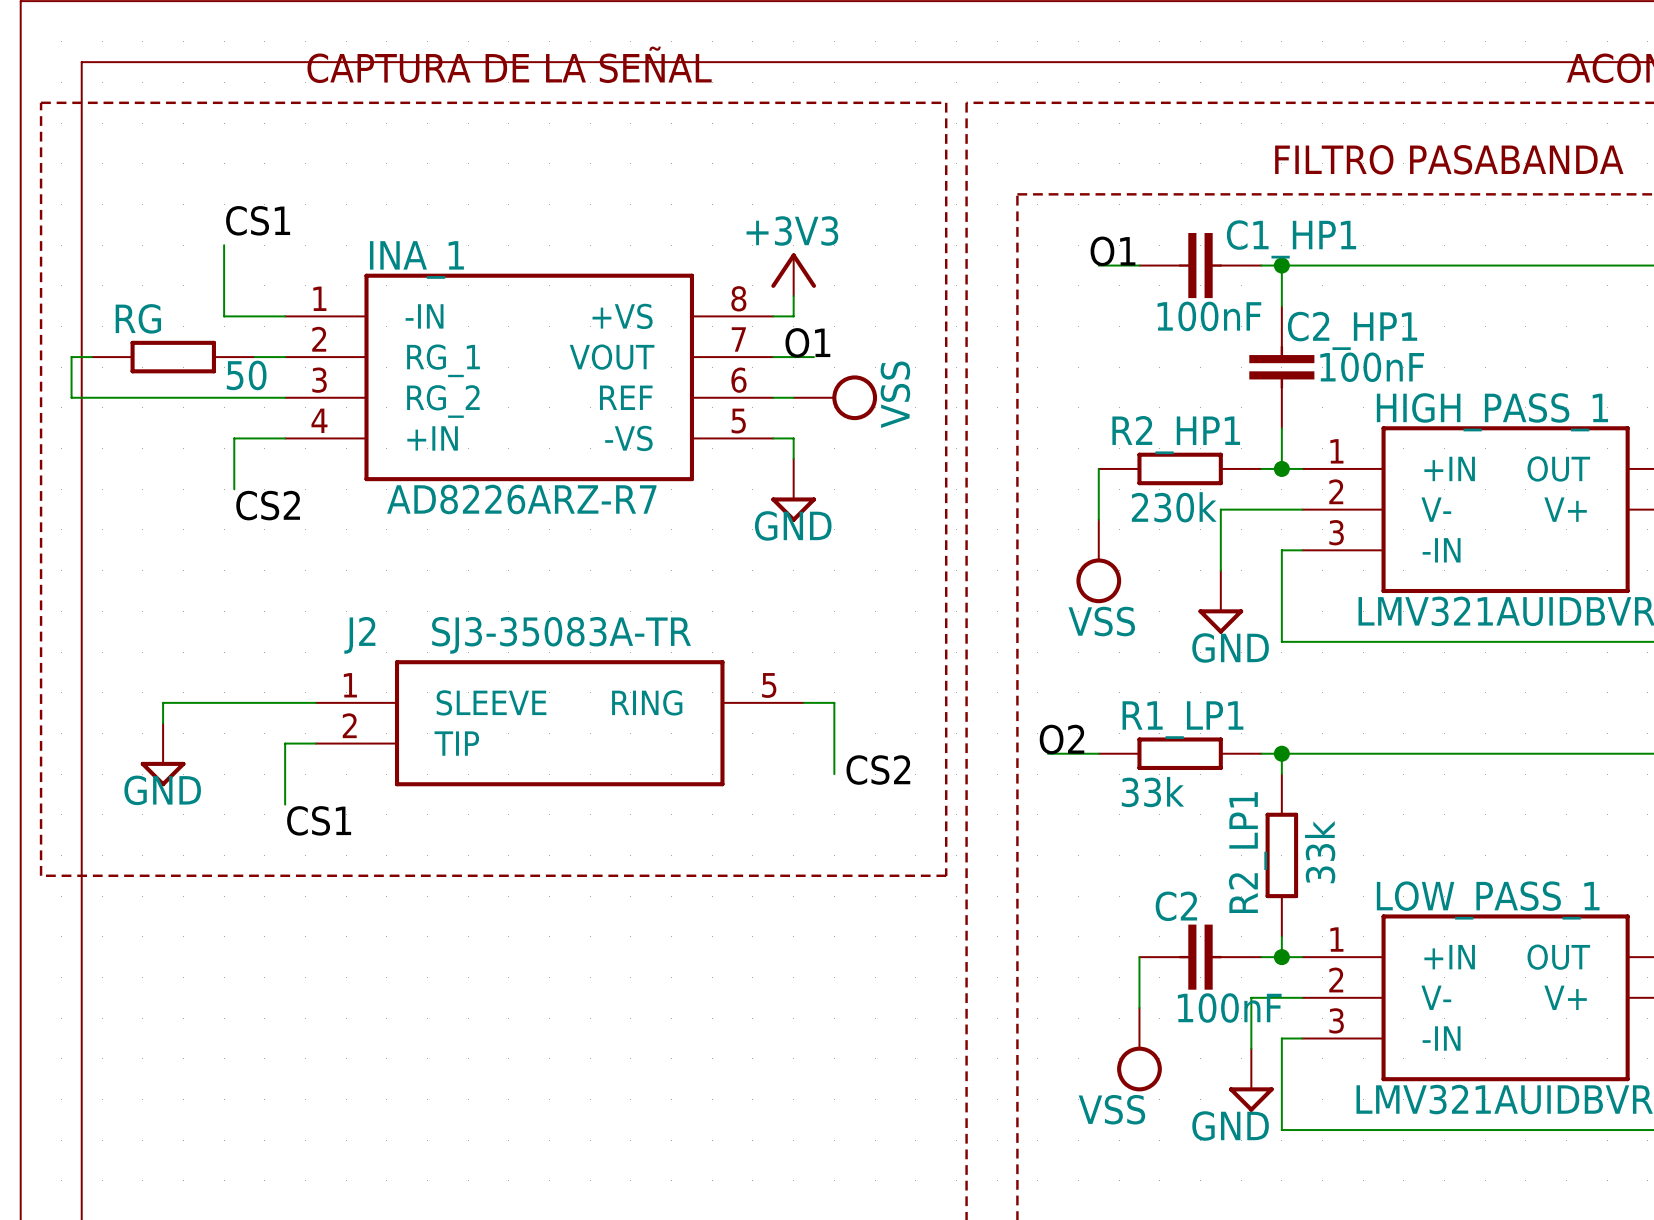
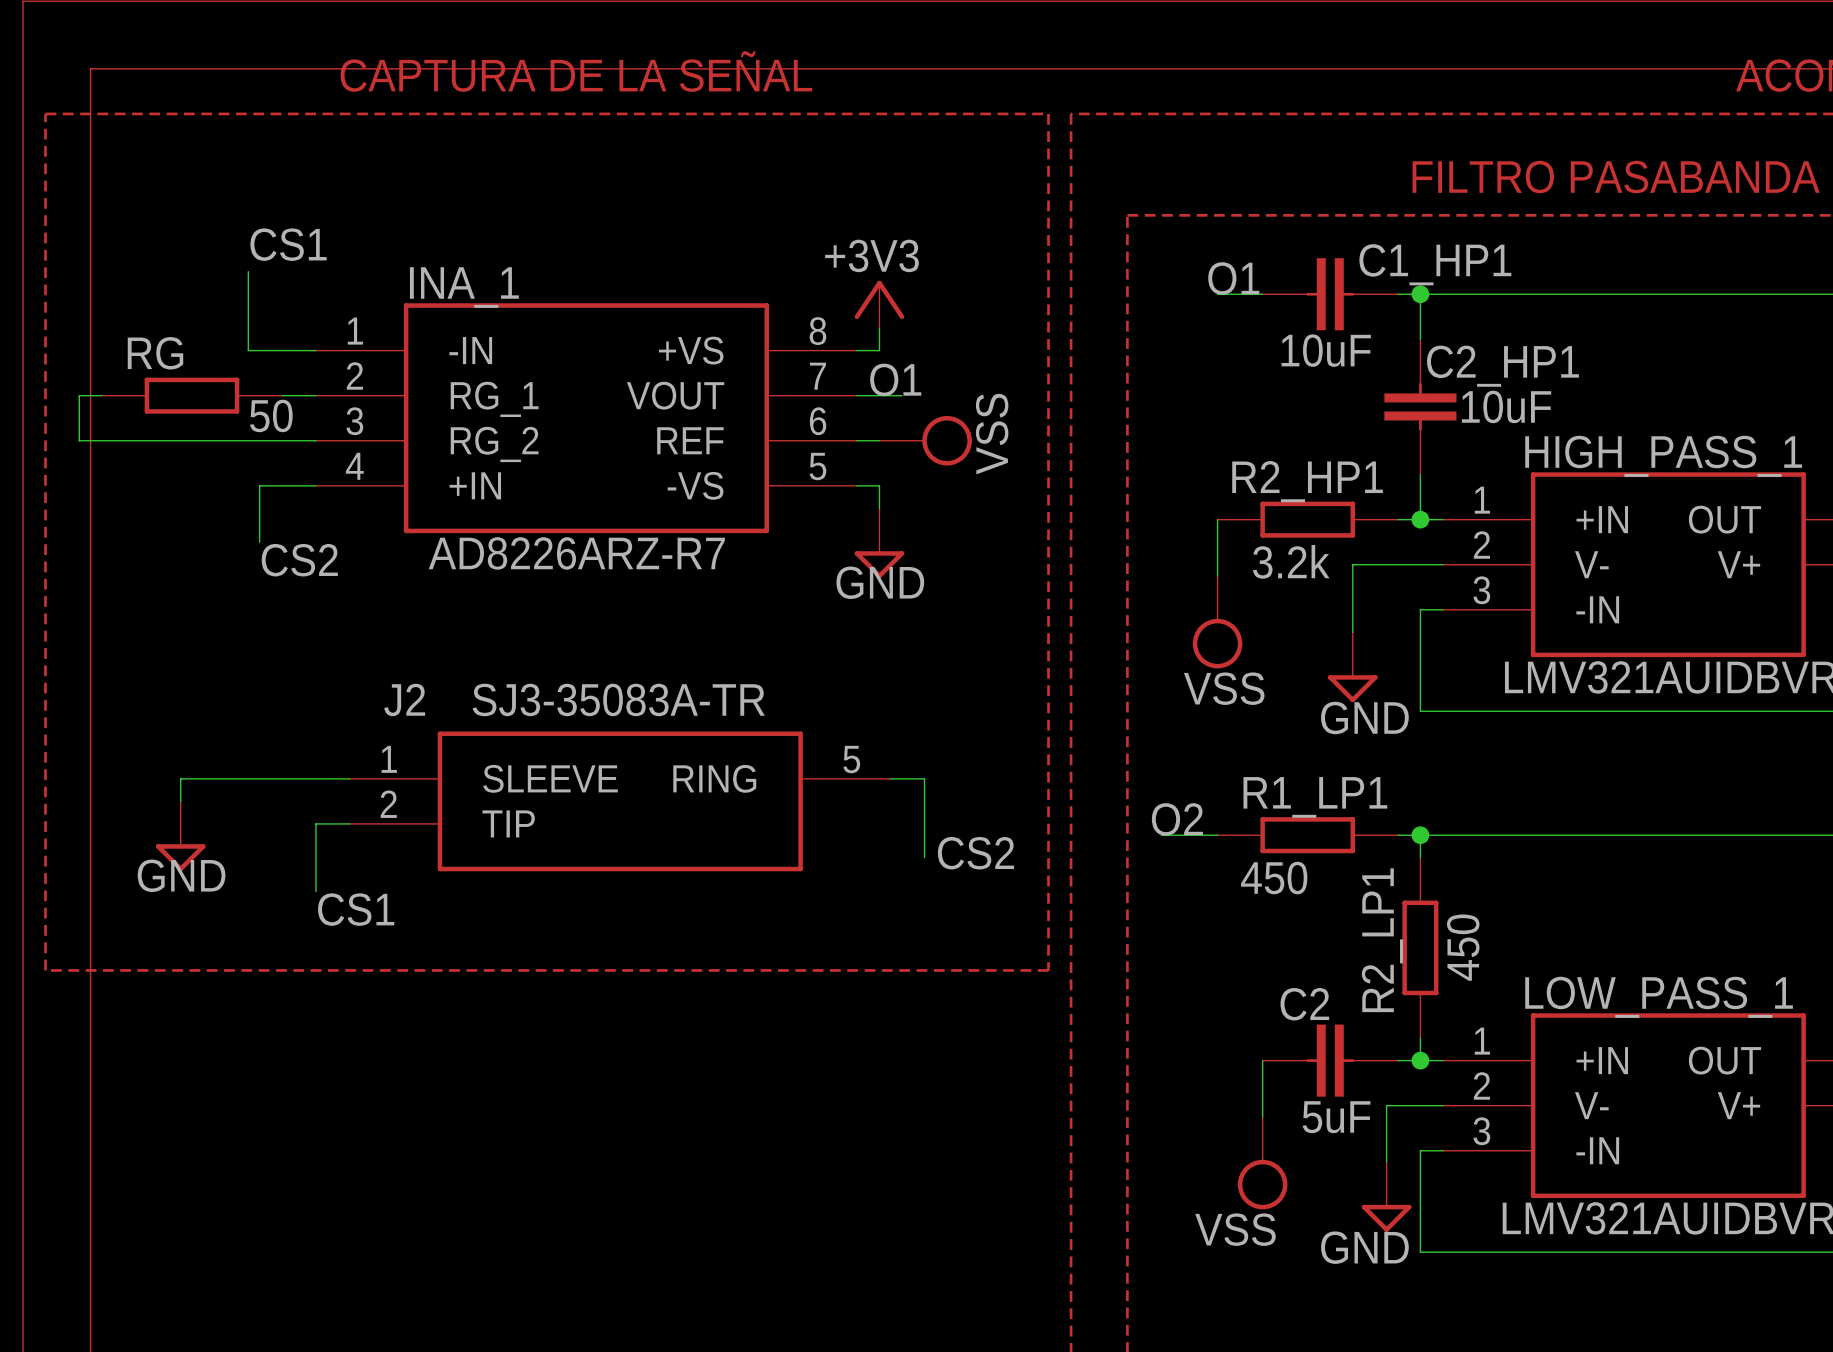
C1_HP1 value: 100nF (1209, 316) -> 10uF (1326, 350)
C2_HP1 value: 100nF (1372, 367) -> 10uF (1506, 406)
R2_HP1 value: 230k (1174, 507) -> 3.2k (1291, 561)
R1_LP1 value: 33k (1152, 792) -> 450 (1274, 878)
R2_LP1 value: 33k (1320, 852) -> 450 (1463, 947)
C2 value: 100nF (1229, 1008) -> 5uF (1336, 1117)

